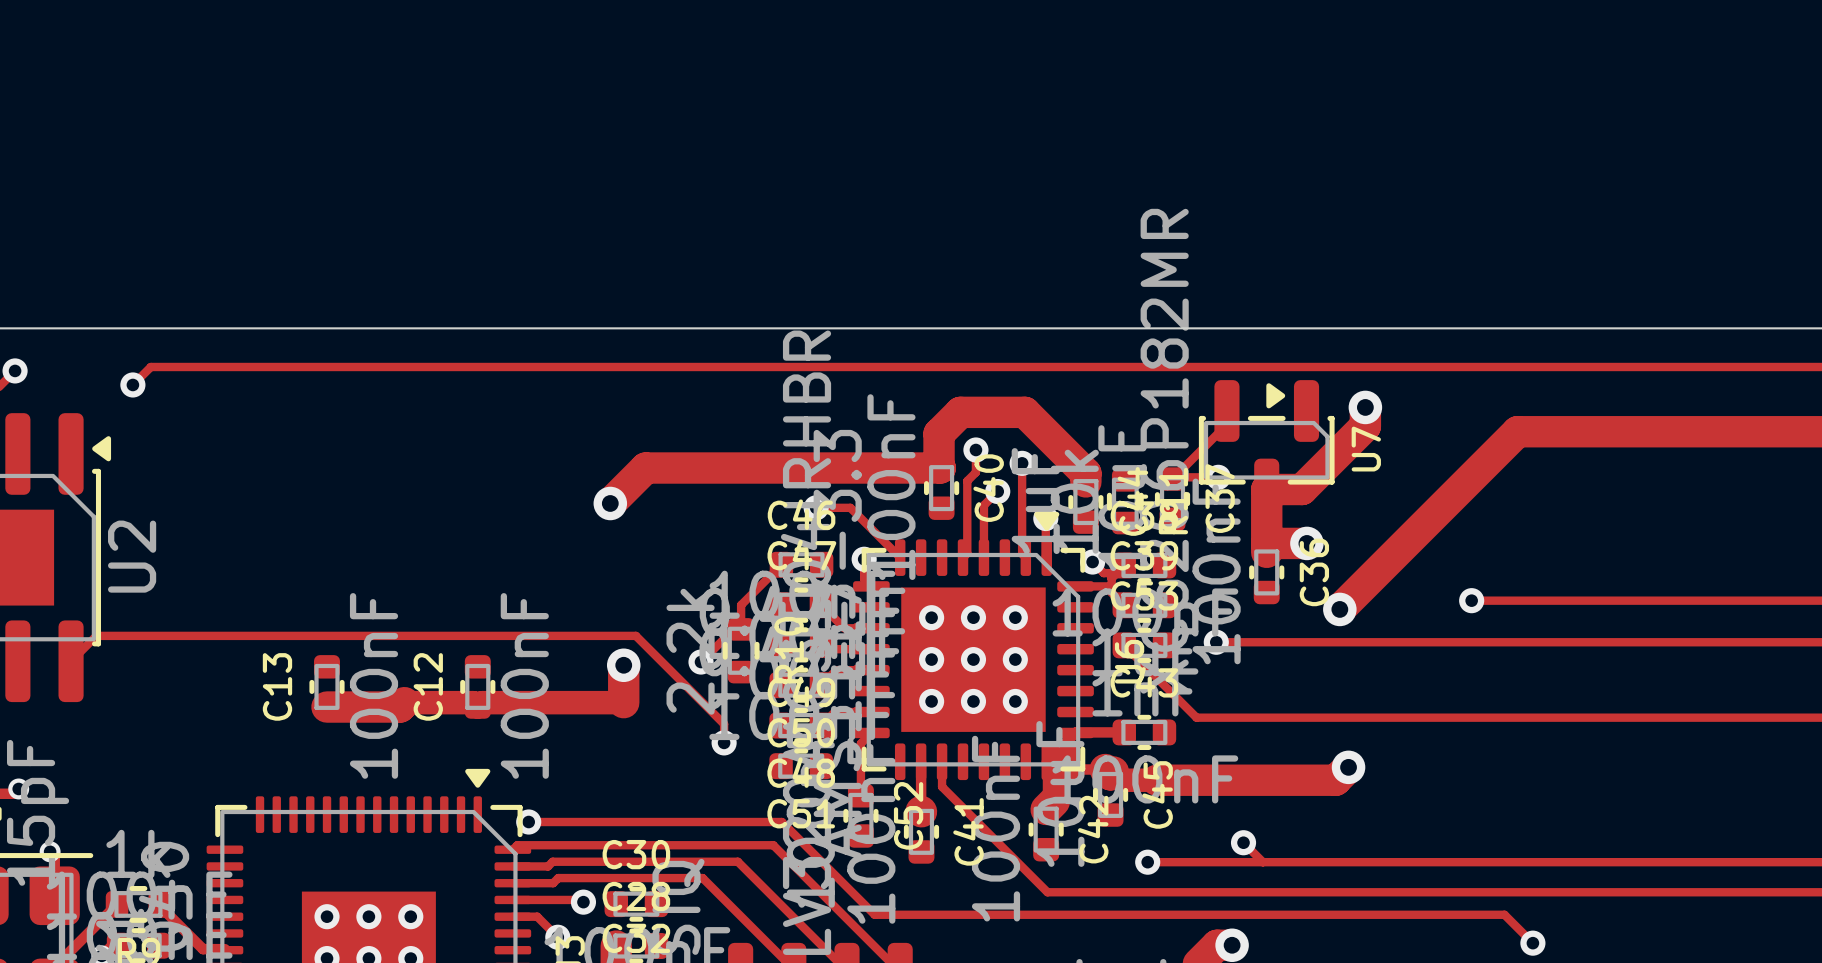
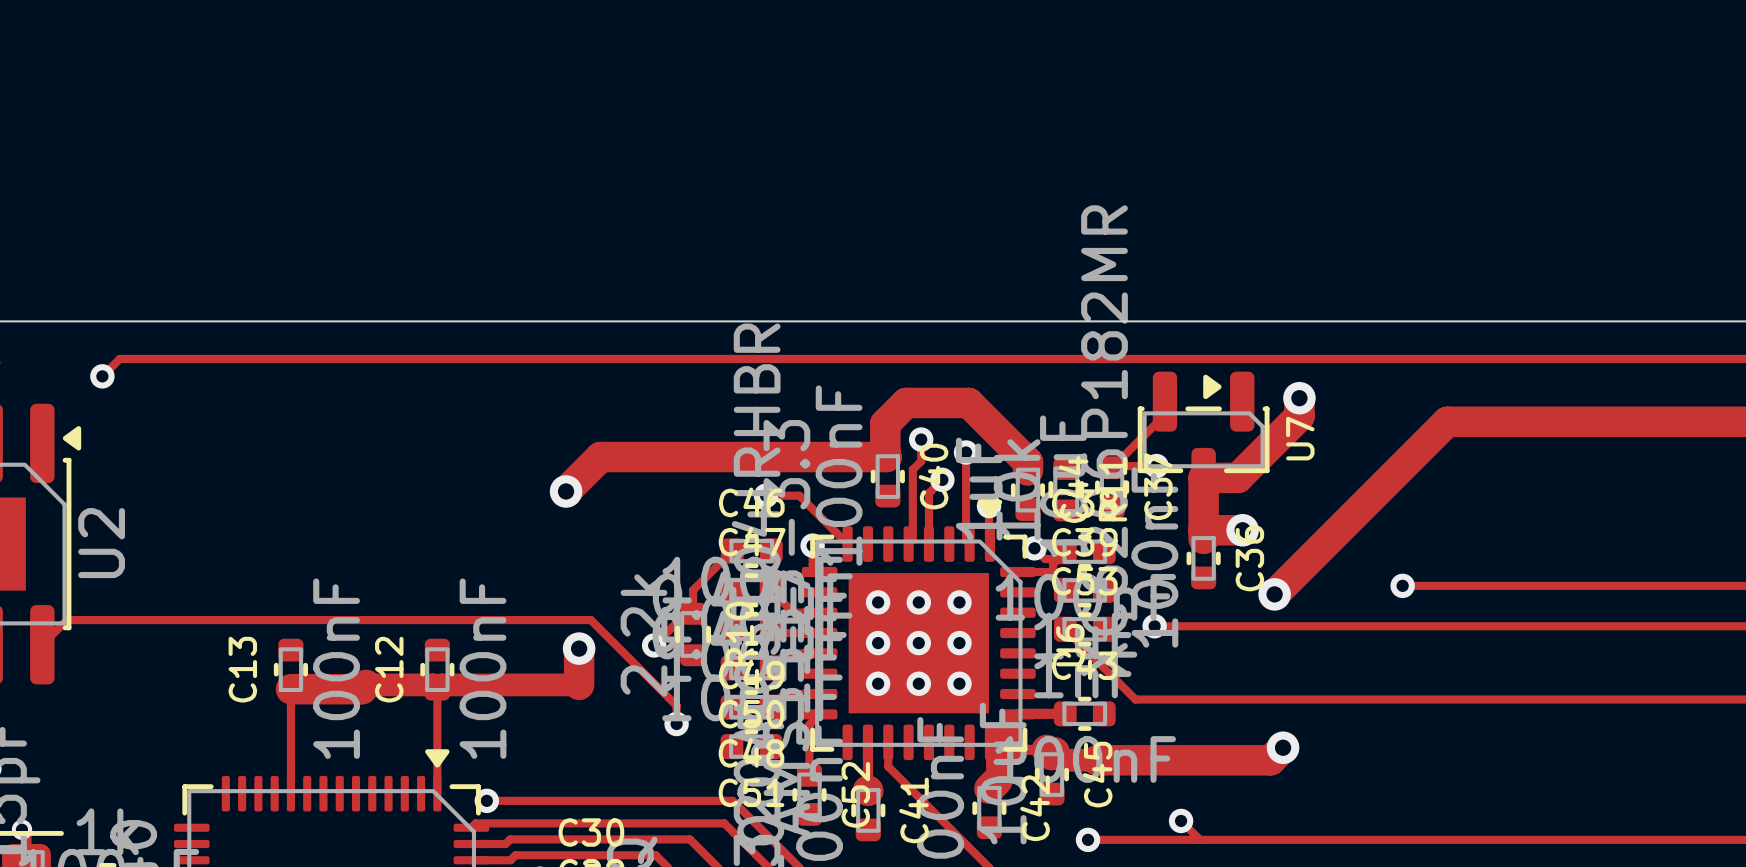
track: none -> (290, 689) (290, 793)
track: none -> (437, 689) (437, 793)

